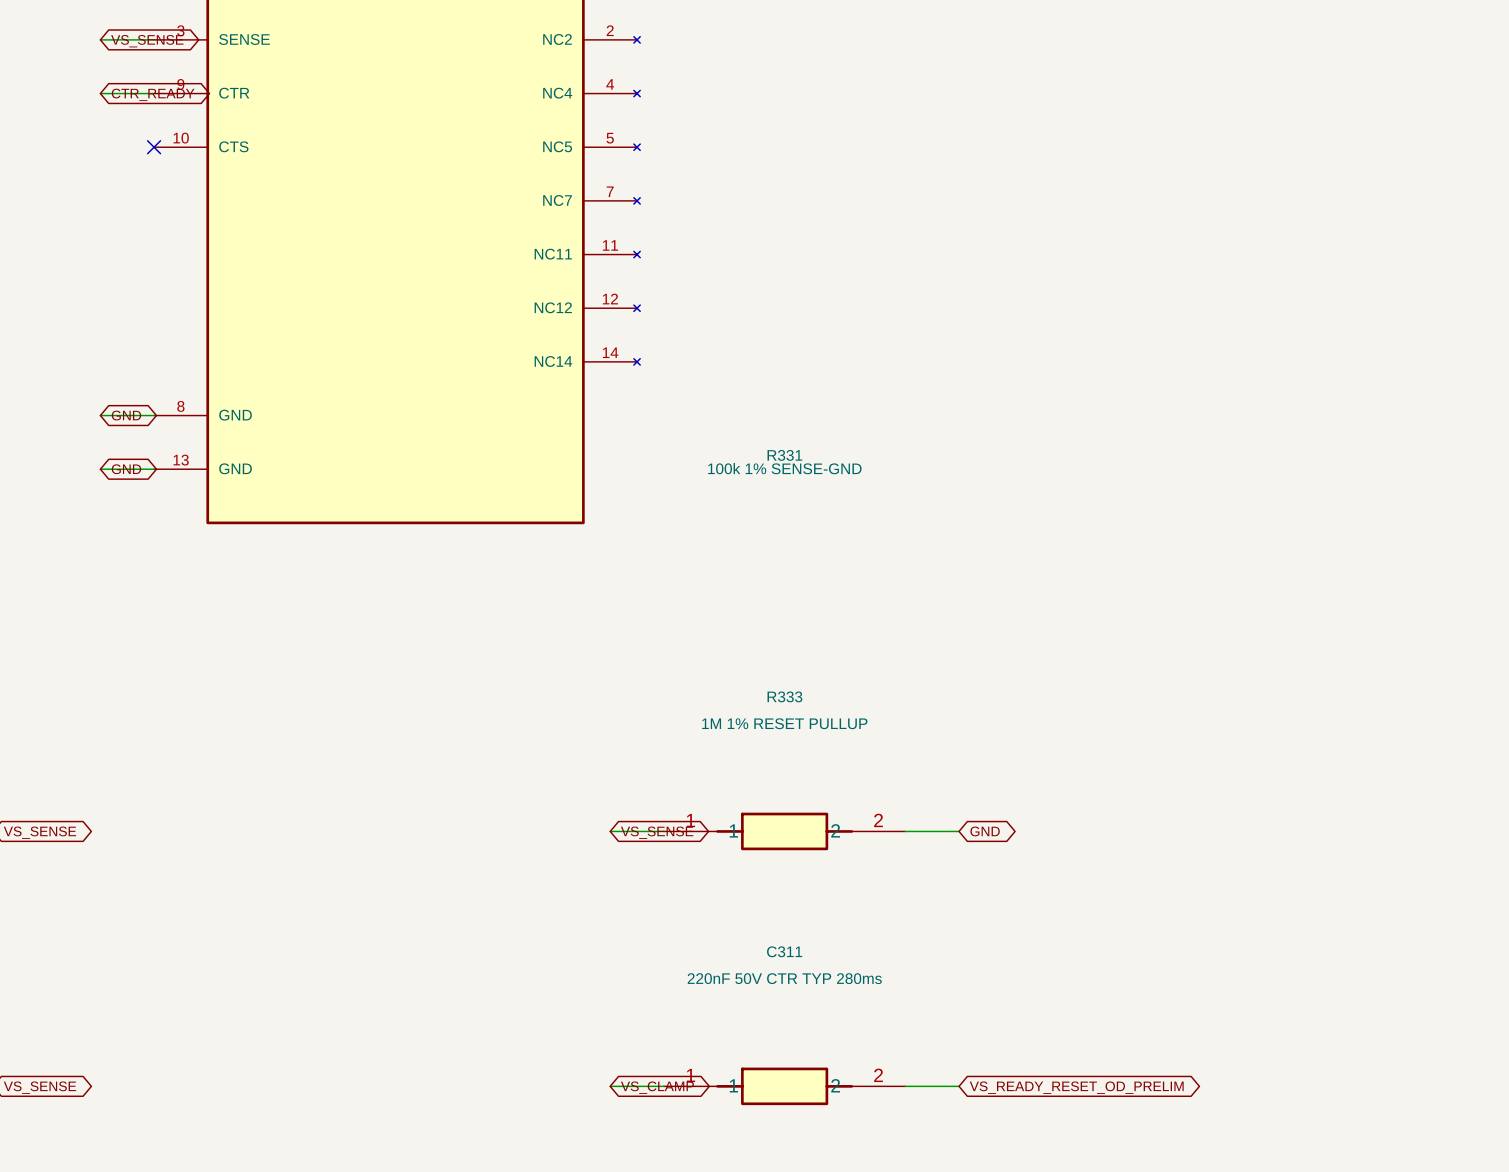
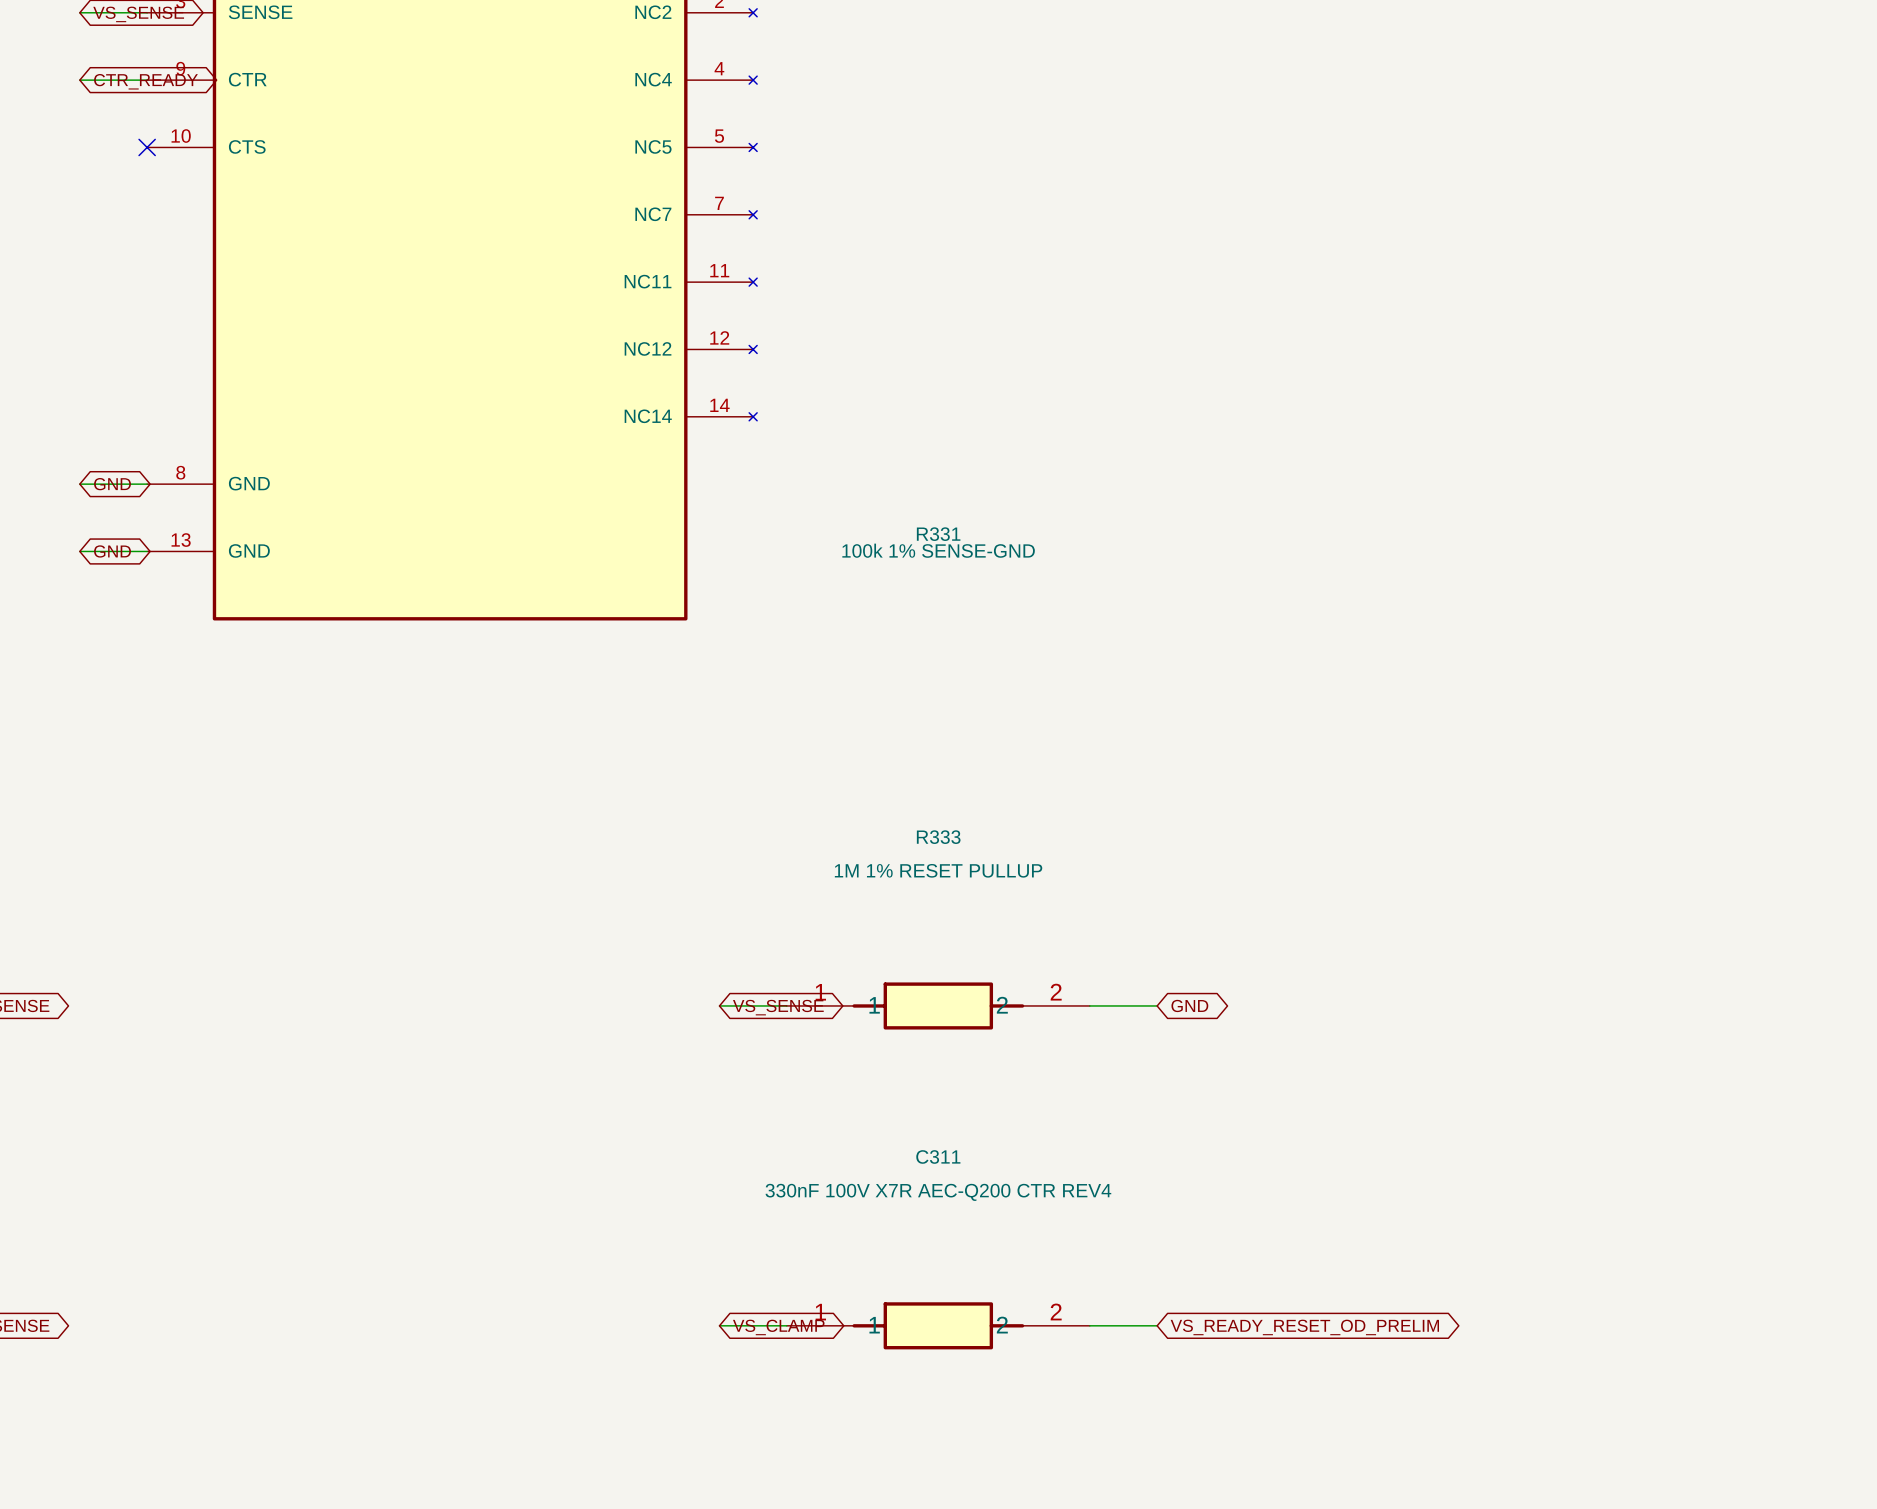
C311 value: 220nF 50V CTR TYP 280ms (784, 978) -> 330nF 100V X7R AEC-Q200 CTR REV4 (938, 1192)

